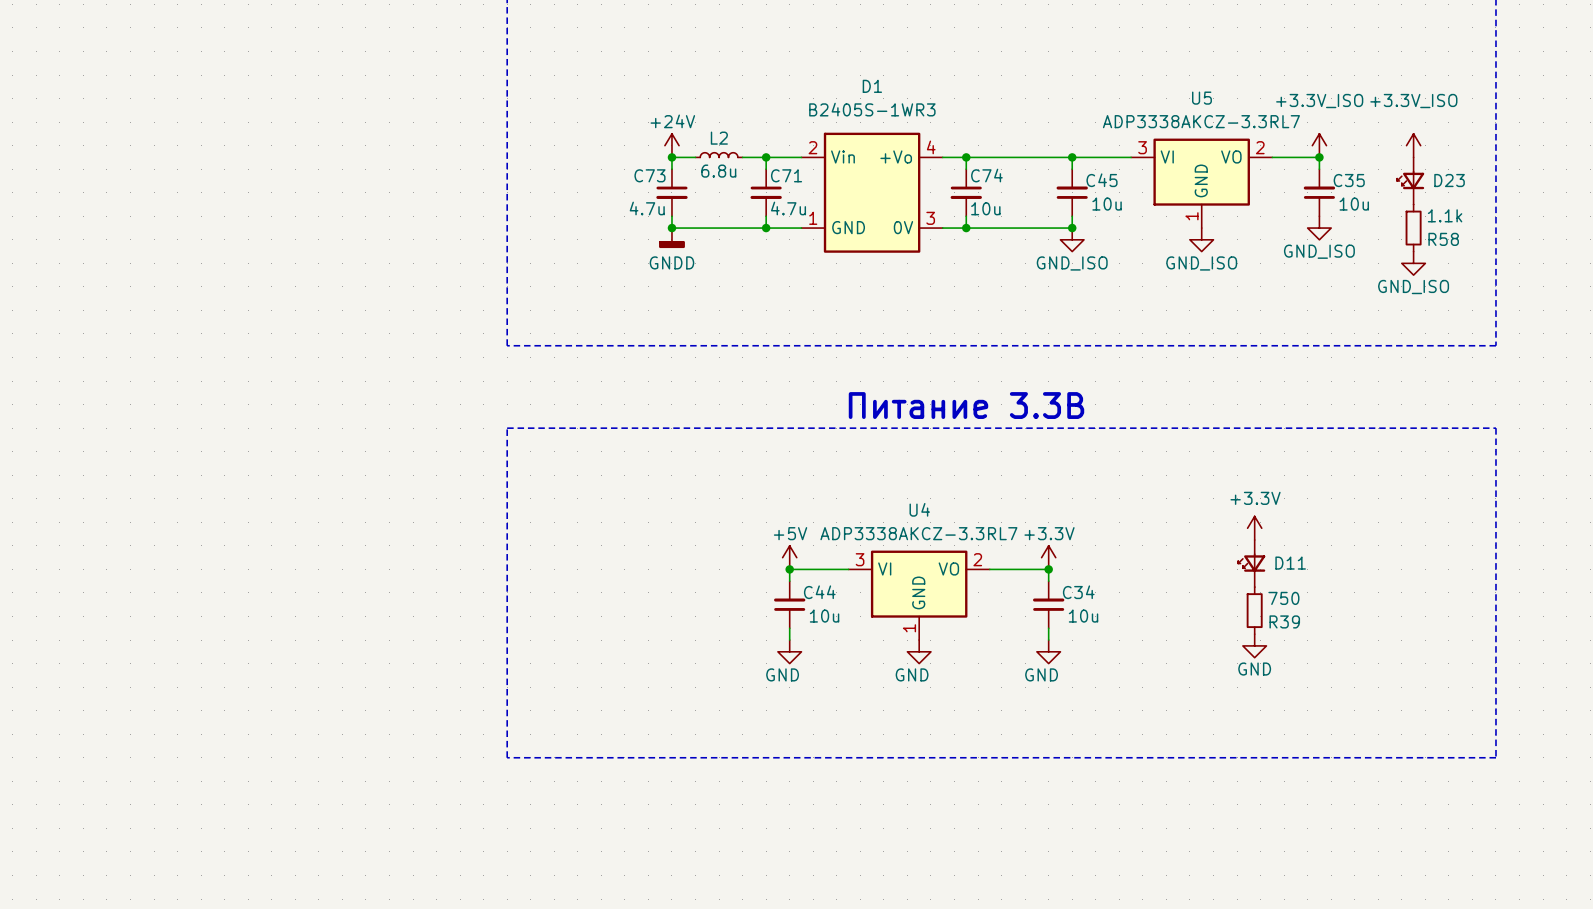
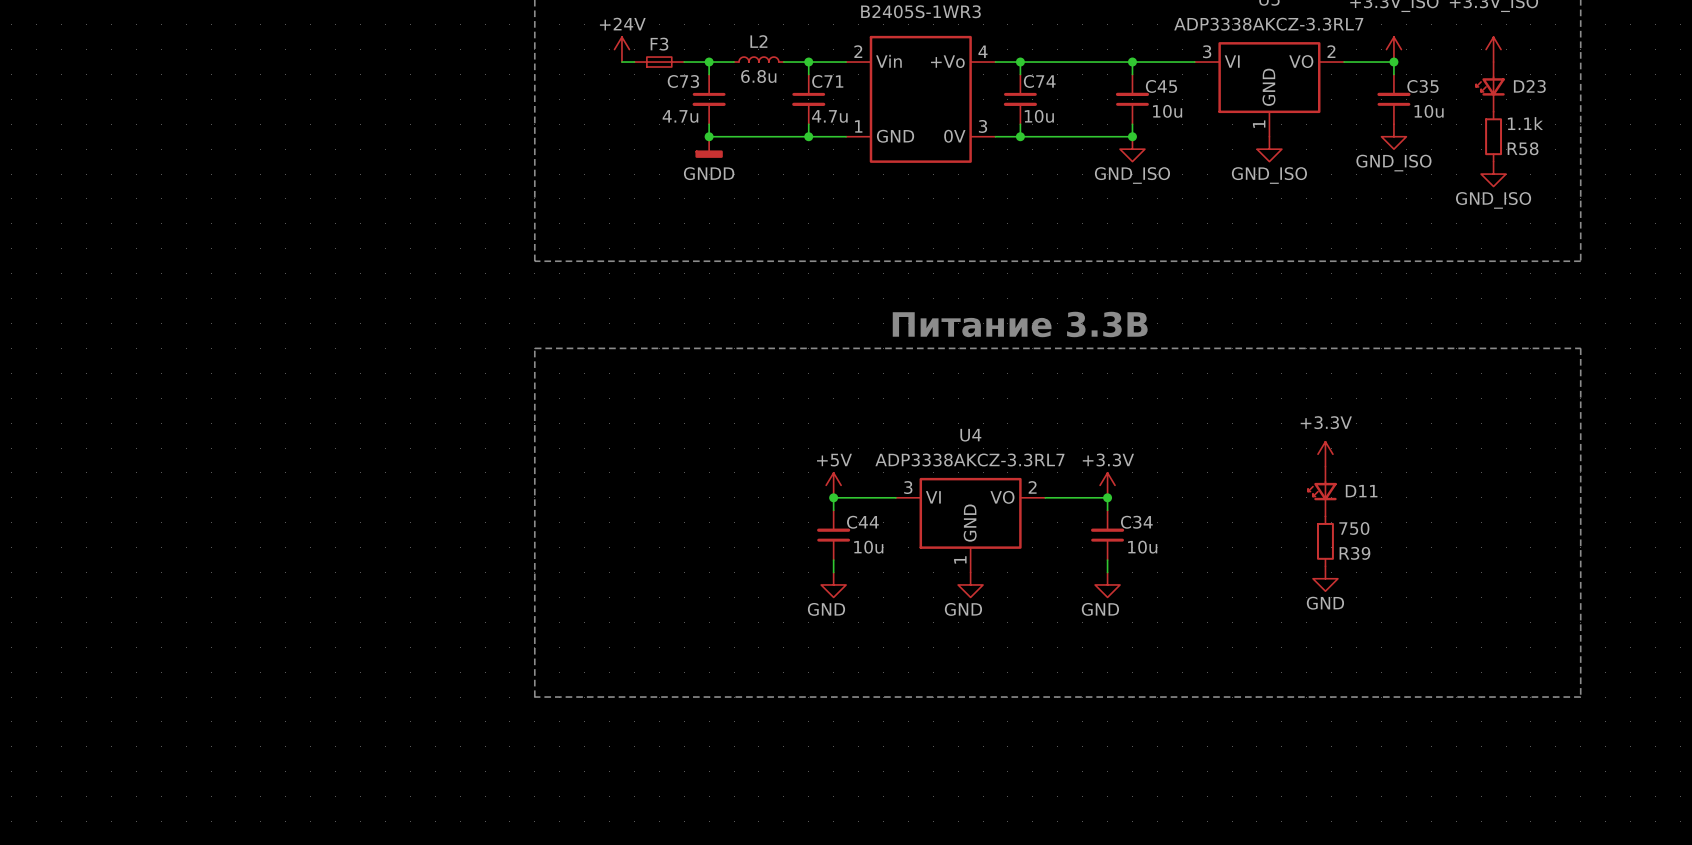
power symbol position: +24V (671, 145) -> +24V (621, 49)
wire: none -> (621, 62) (634, 62)
F3: none -> (659, 62)
wire: none -> (684, 62) (709, 62)

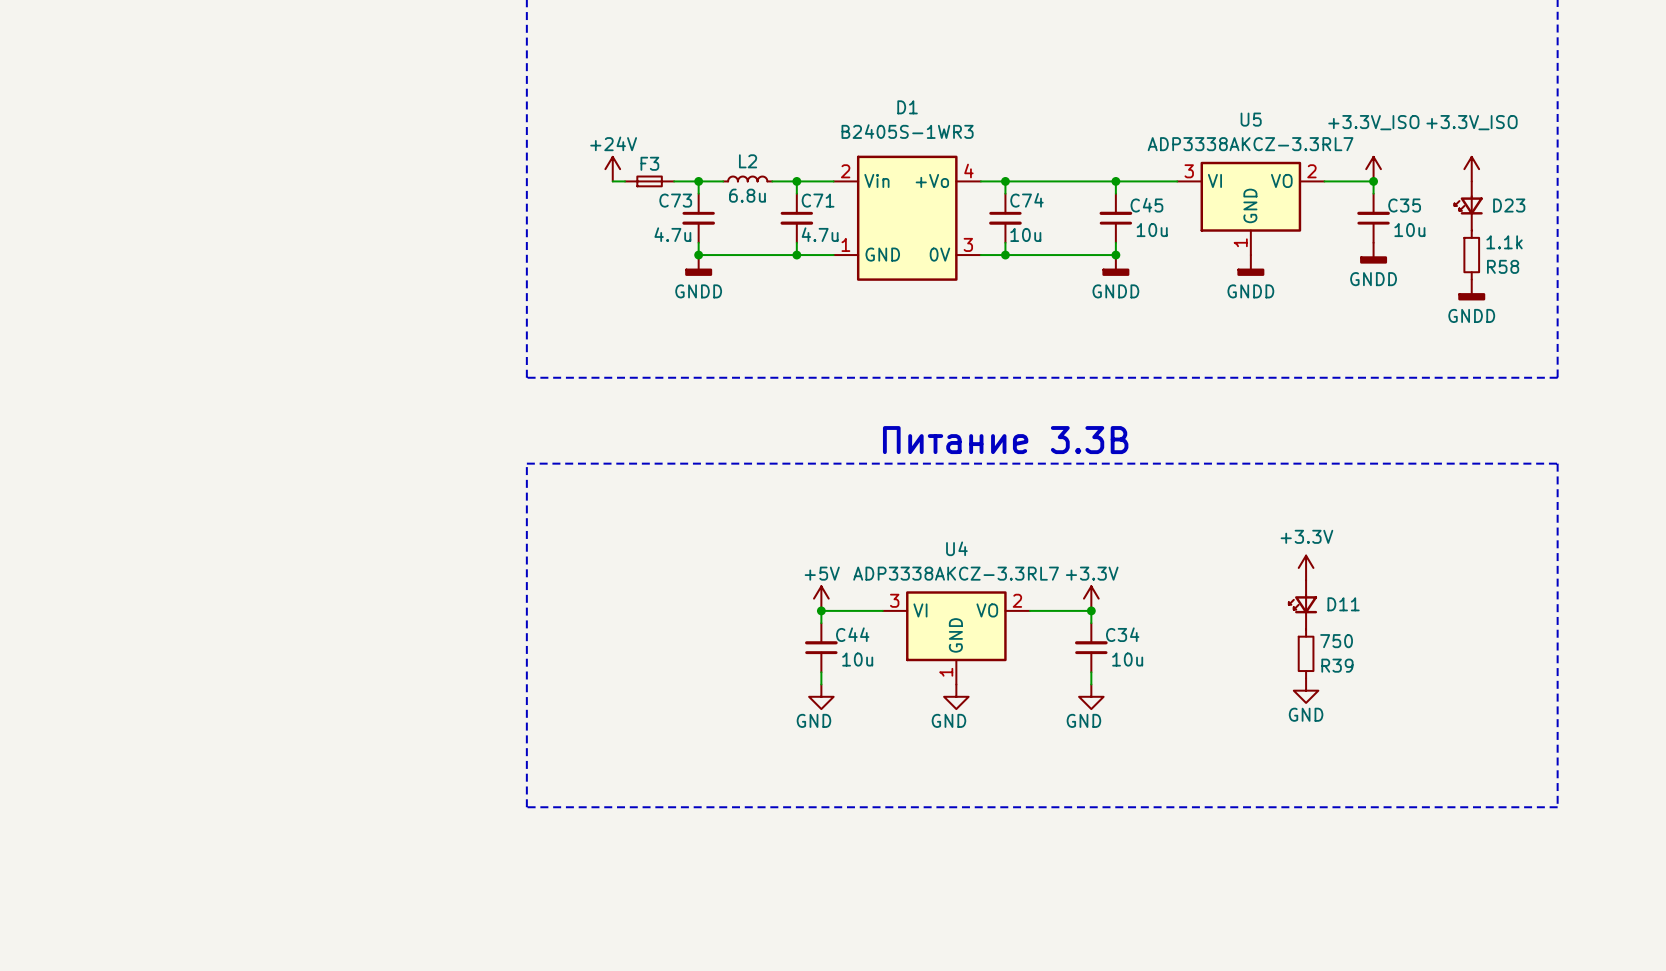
power symbol: GND_ISO (1393, 136) -> GNDD (1373, 253)
power symbol: GND_ISO (1132, 149) -> GNDD (1115, 265)
power symbol: GND_ISO (1269, 149) -> GNDD (1250, 265)
power symbol: GND_ISO (1493, 174) -> GNDD (1471, 290)

